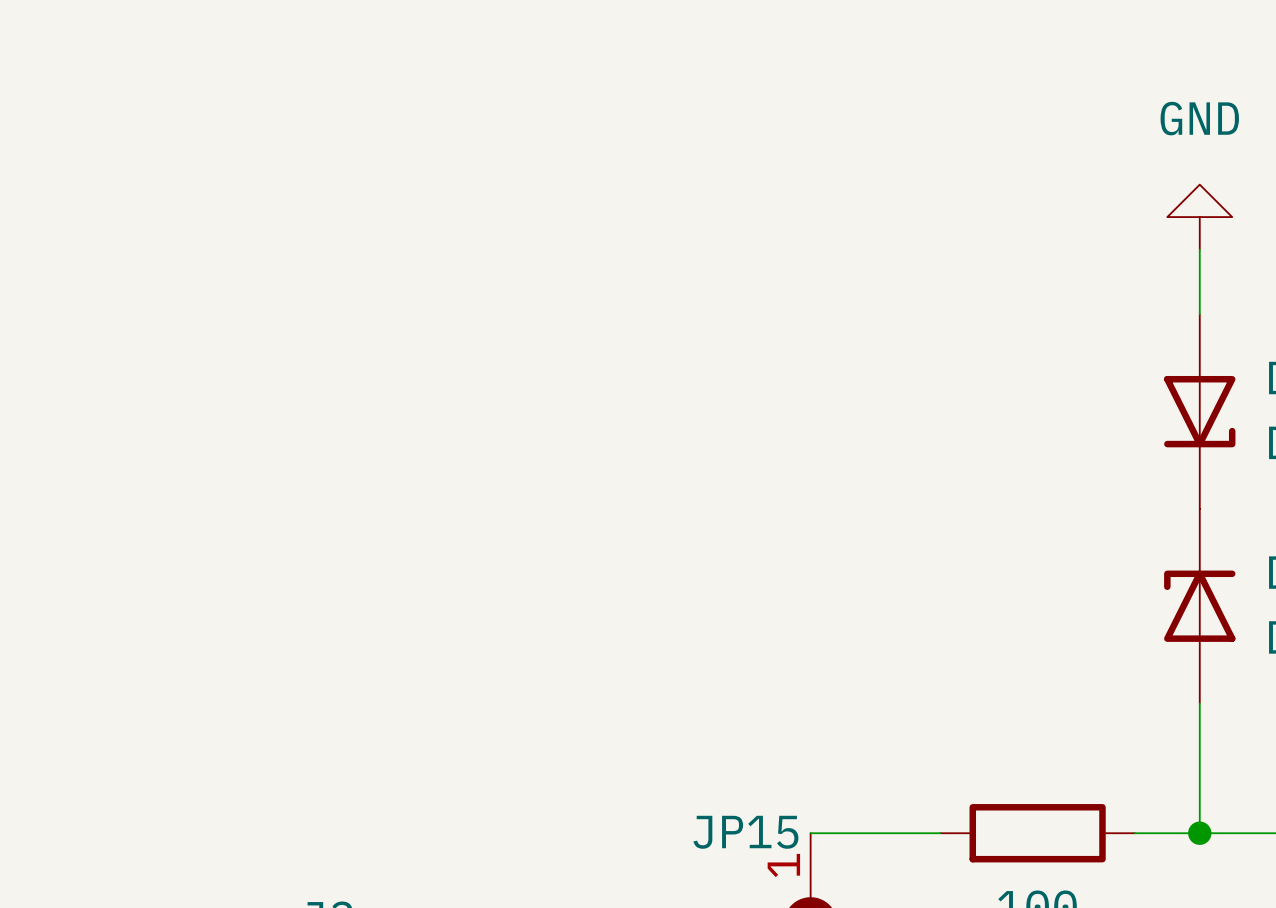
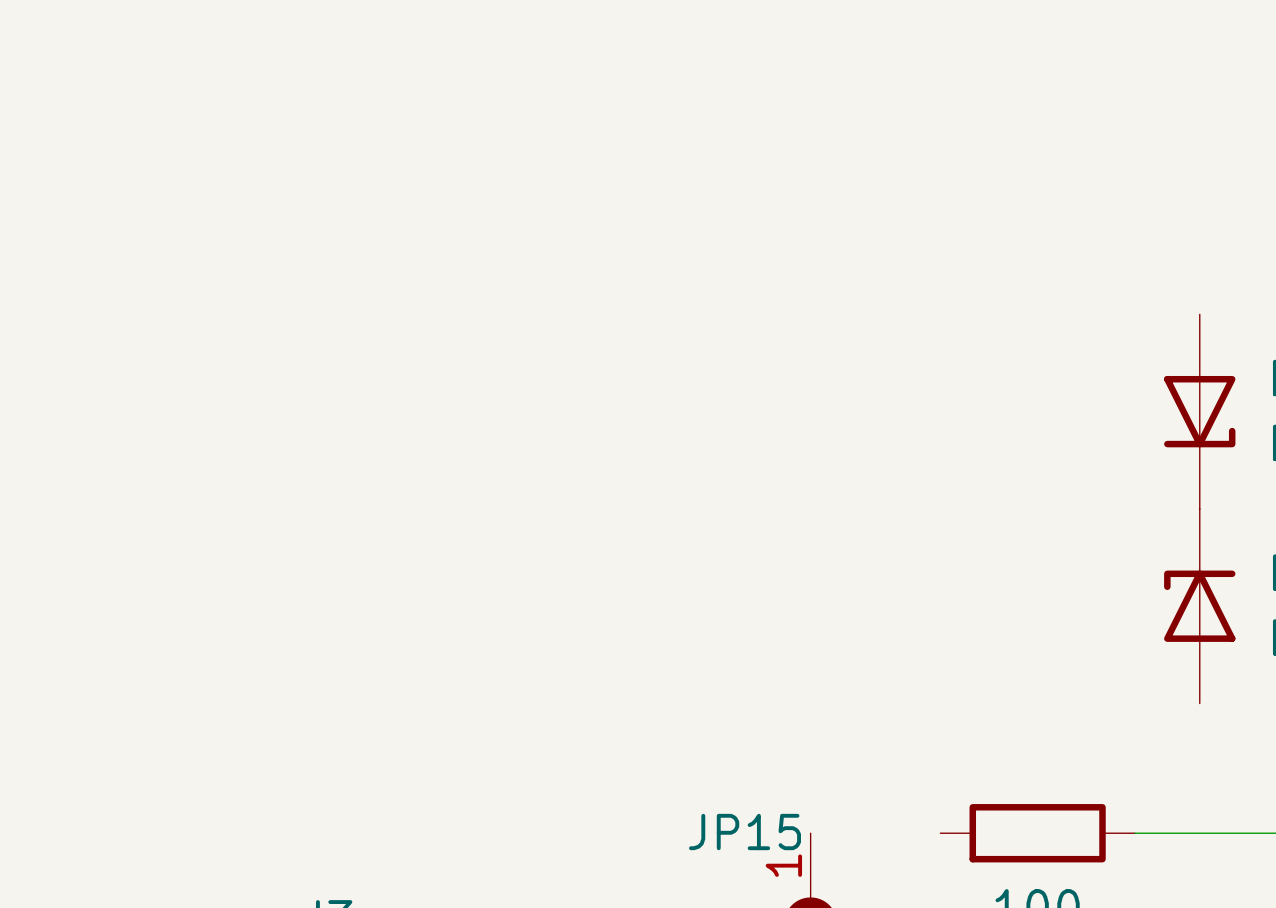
power symbol: GND (1199, 217) -> none
wire: (1199, 249) (1199, 314) -> none
wire: (1199, 703) (1199, 833) -> none
wire: (810, 833) (940, 833) -> none
junction: (1199, 833) -> none

